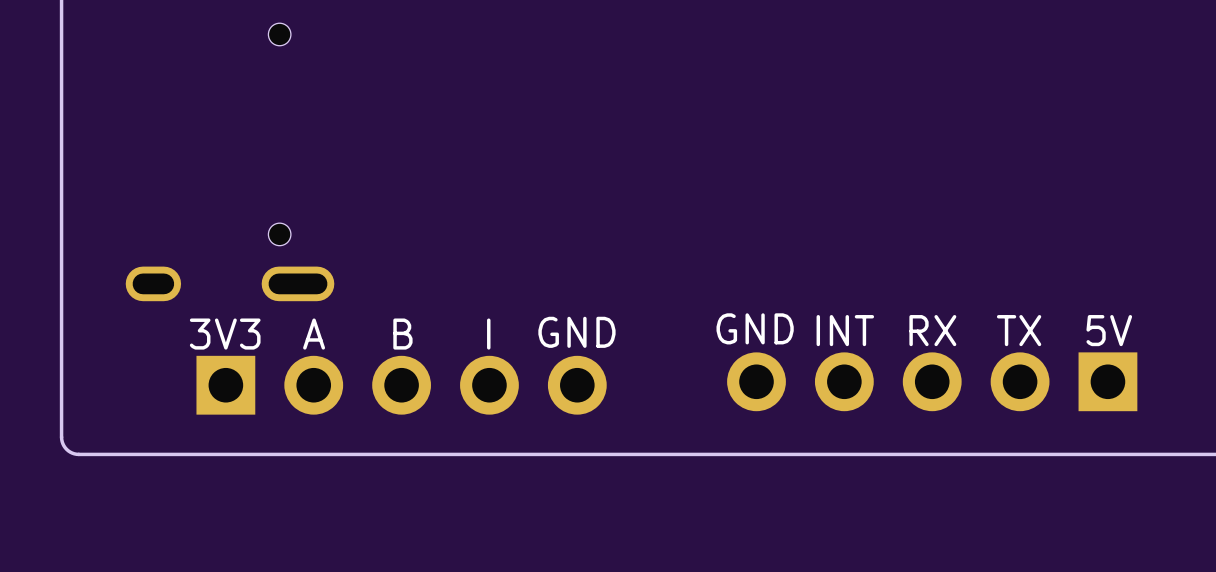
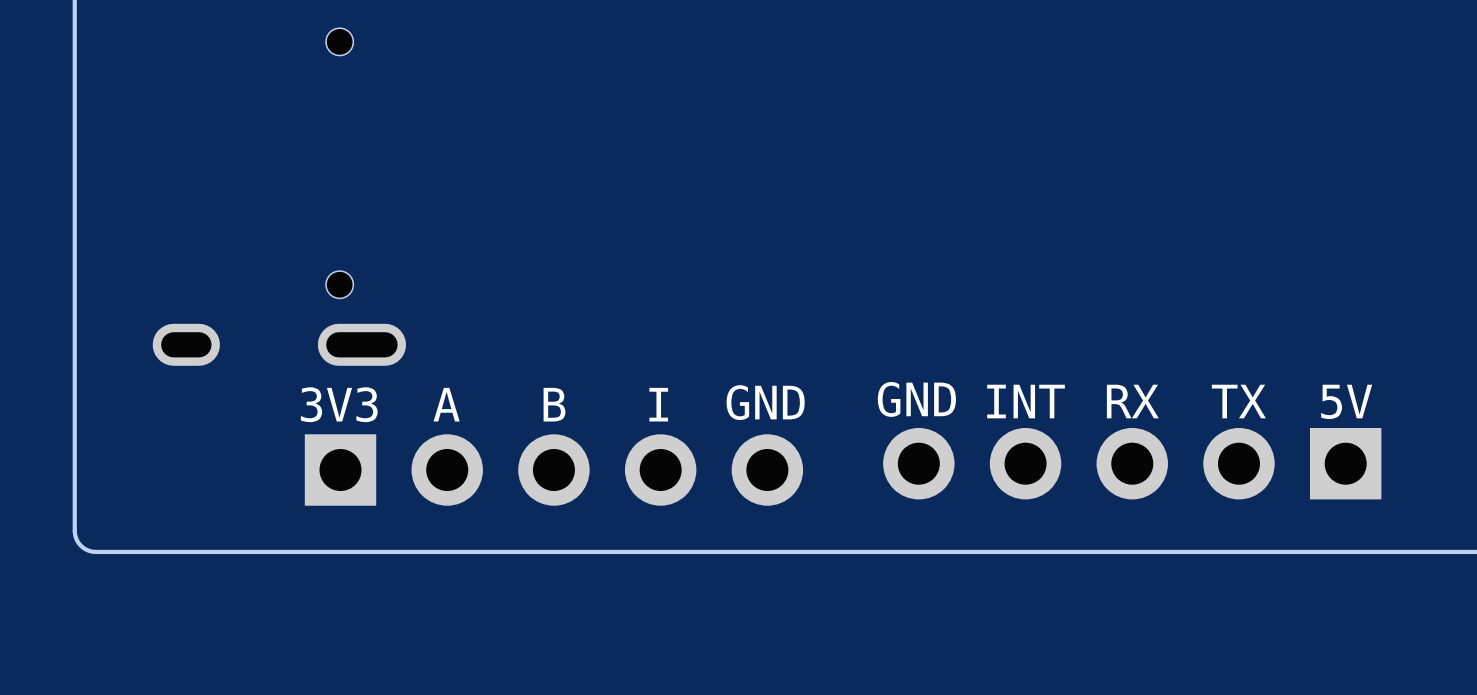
text position: GND (576, 332) -> GND (765, 402)
text position: 3V3 (225, 334) -> 3V3 (339, 404)
text position: A (314, 334) -> A (446, 404)
text position: B (402, 334) -> B (554, 404)
text position: I (488, 334) -> I (658, 404)
part position: (401, 385) -> (553, 470)

